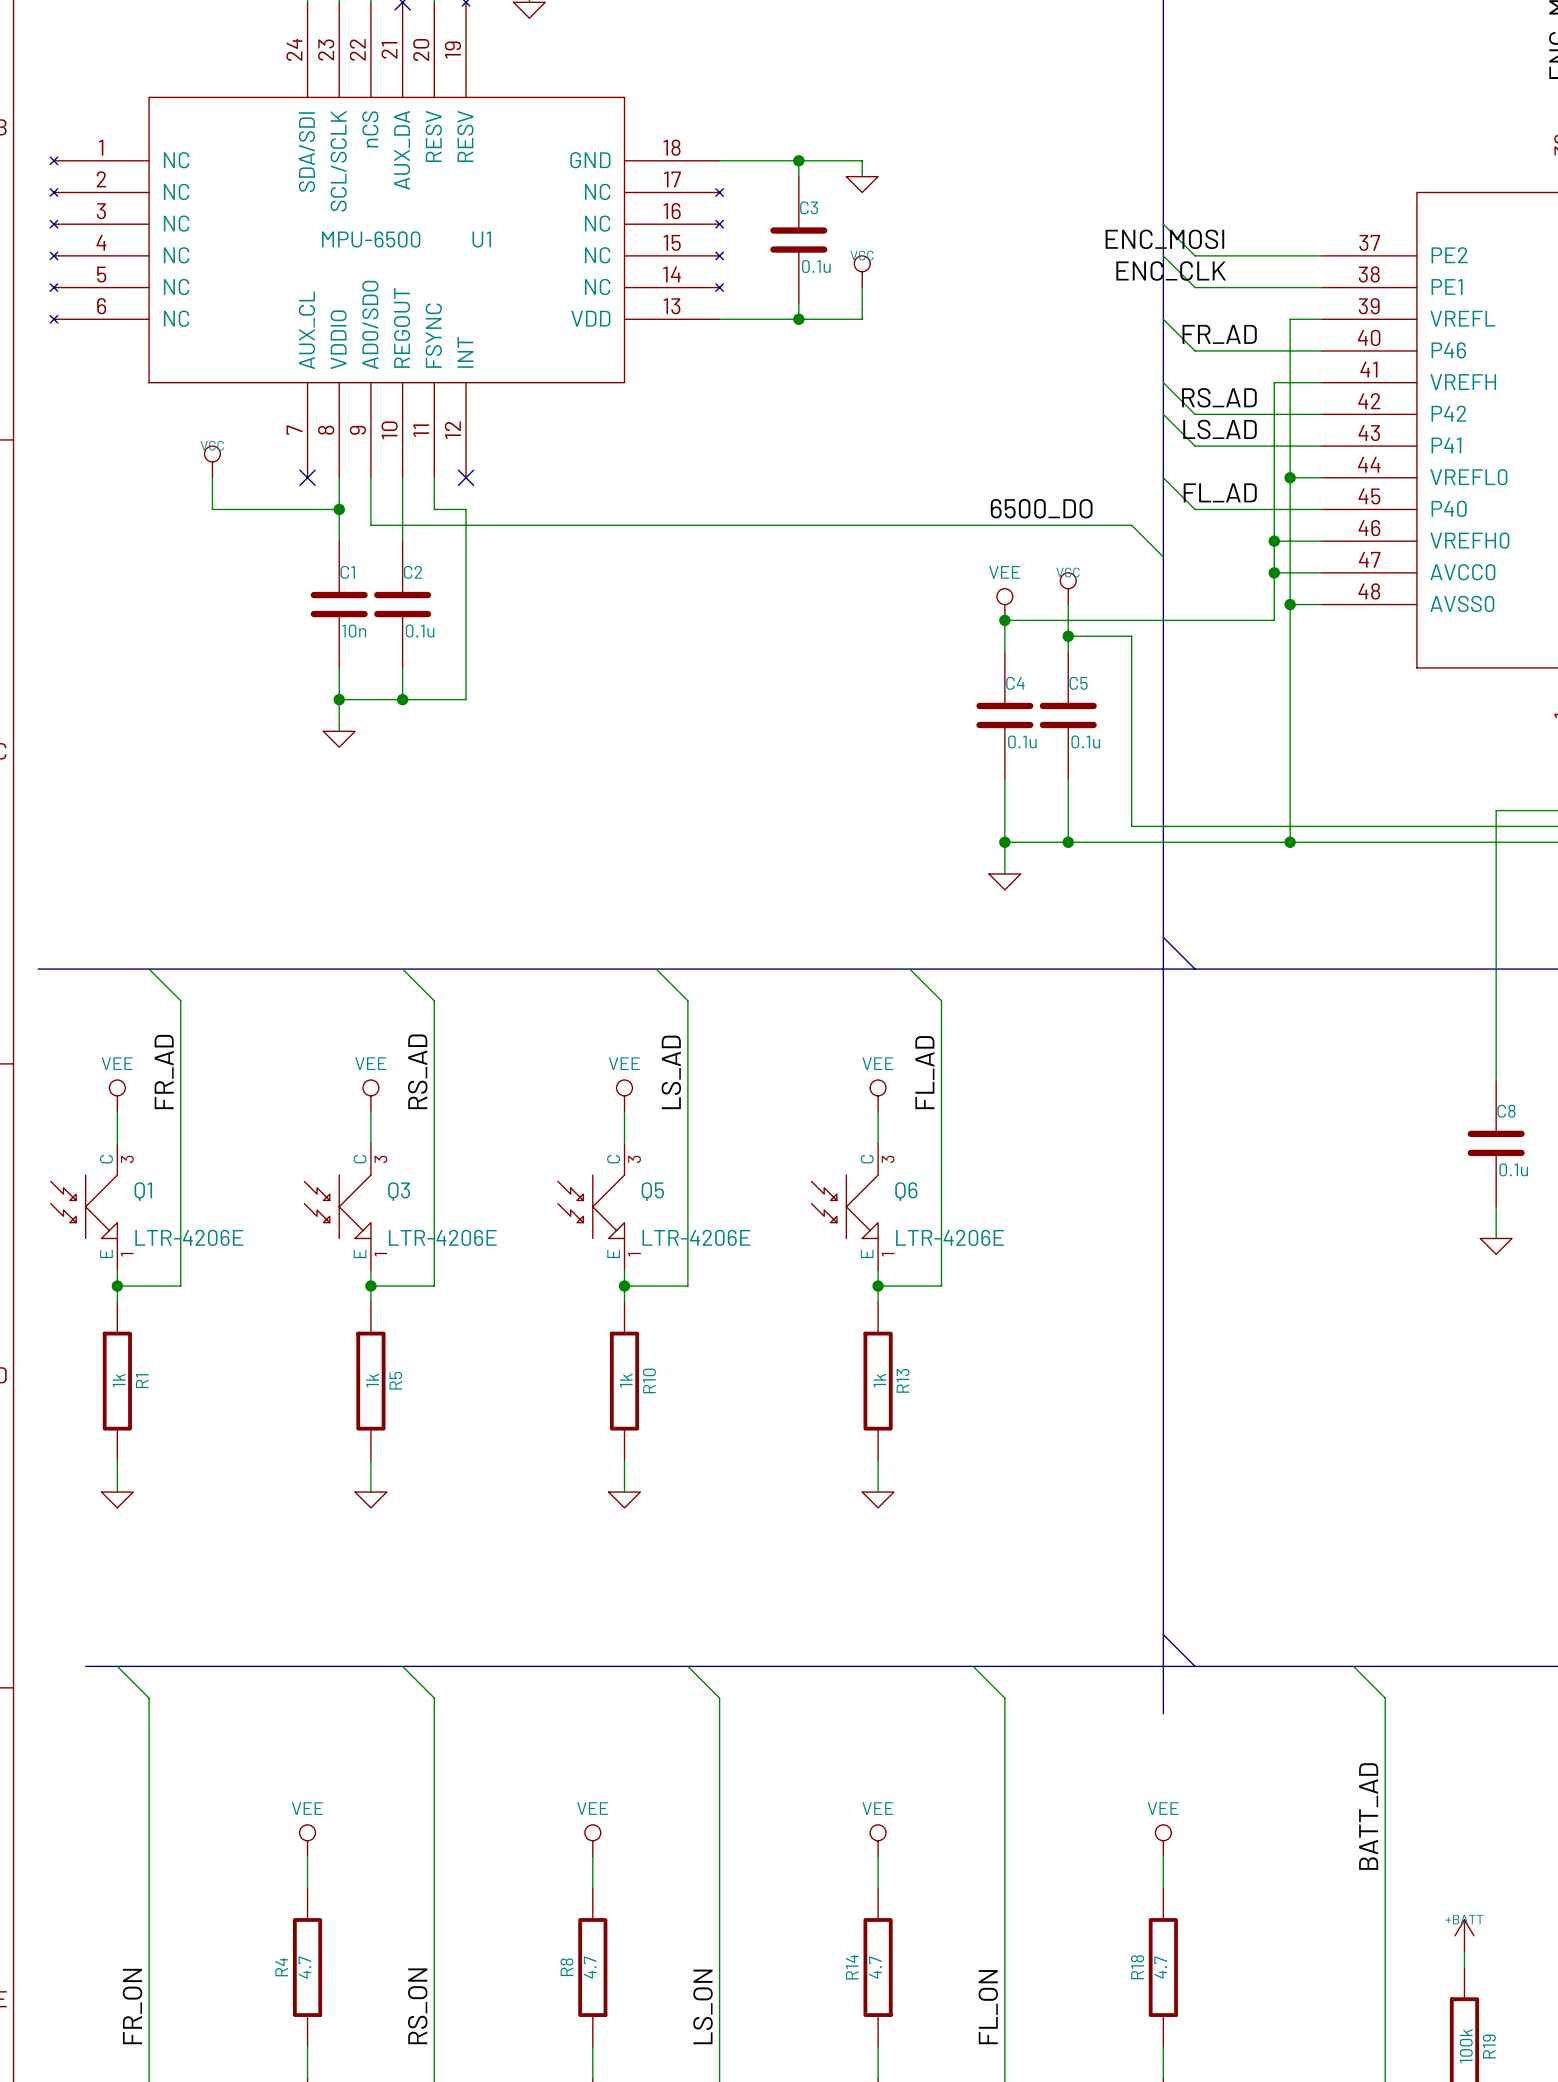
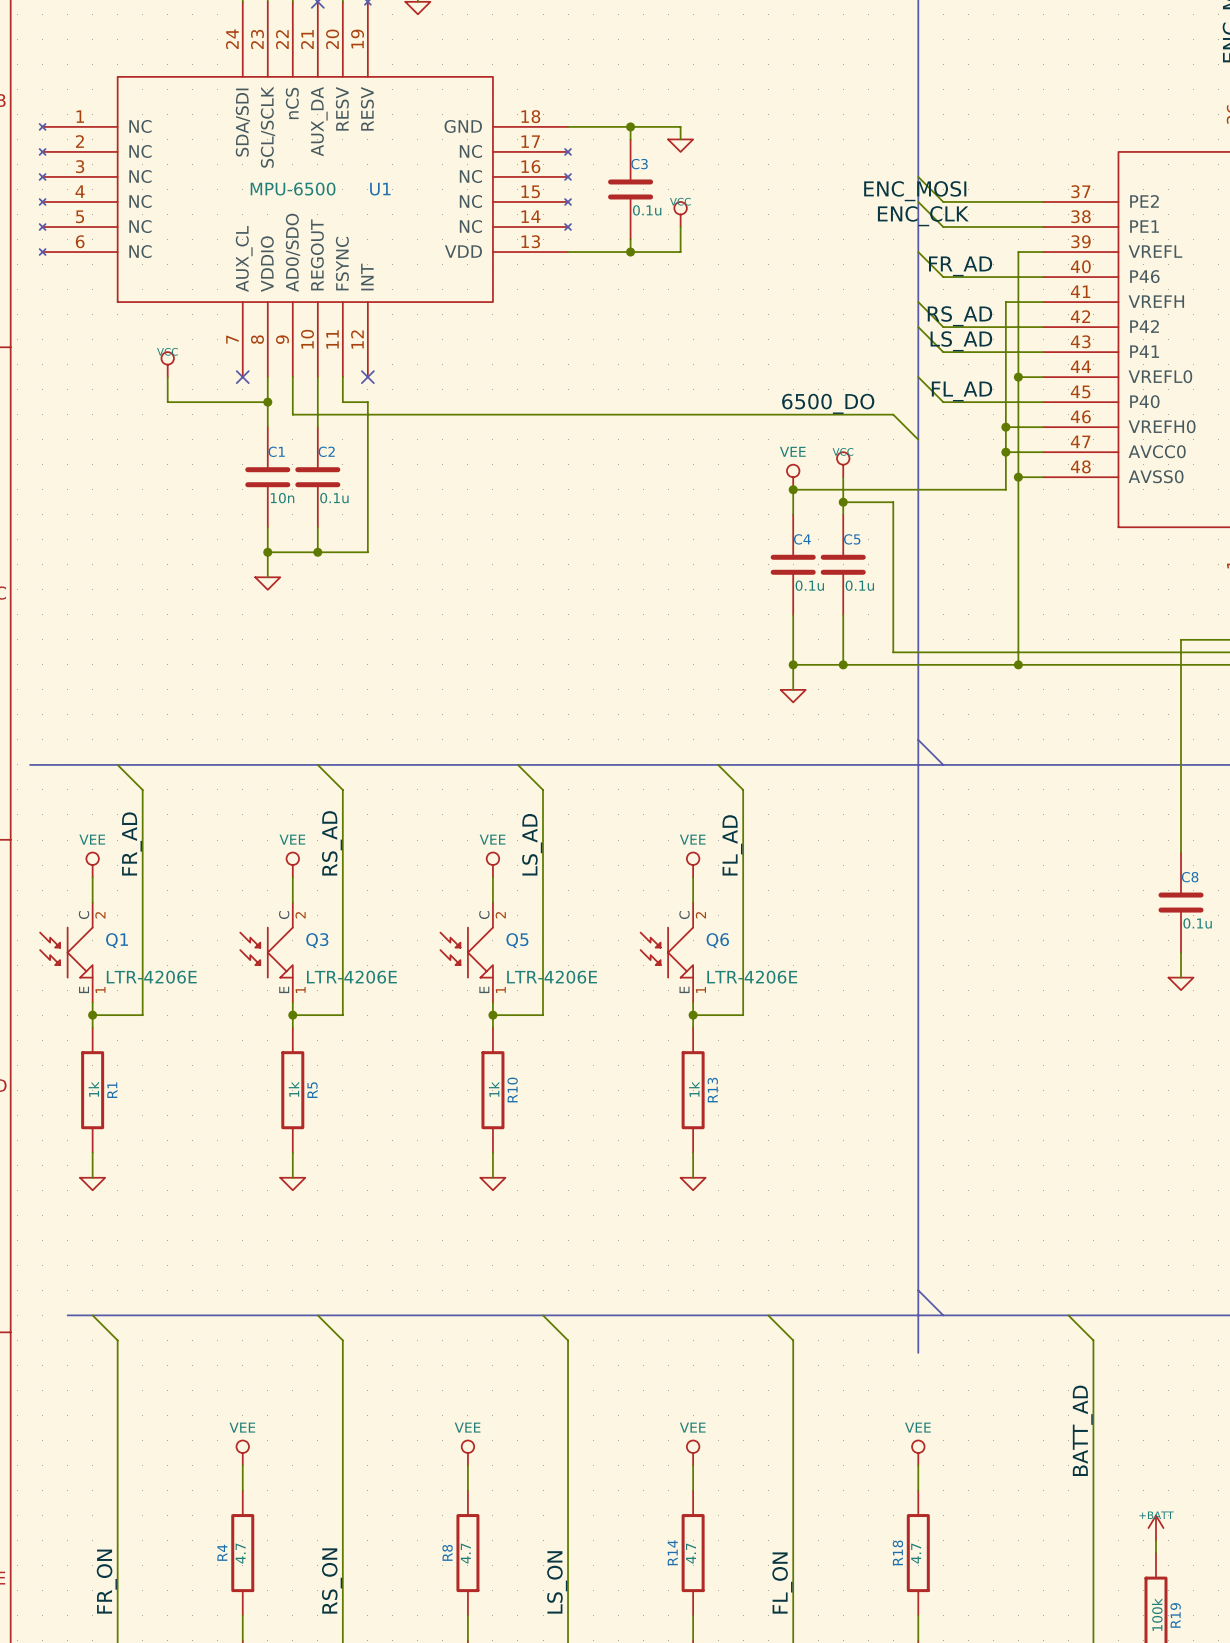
Q1 pin number: 3 (127, 1159) -> 2 (100, 915)
Q3 pin number: 3 (380, 1159) -> 2 (300, 915)
Q5 pin number: 3 (634, 1159) -> 2 (500, 915)
Q6 pin number: 3 (888, 1159) -> 2 (700, 915)

